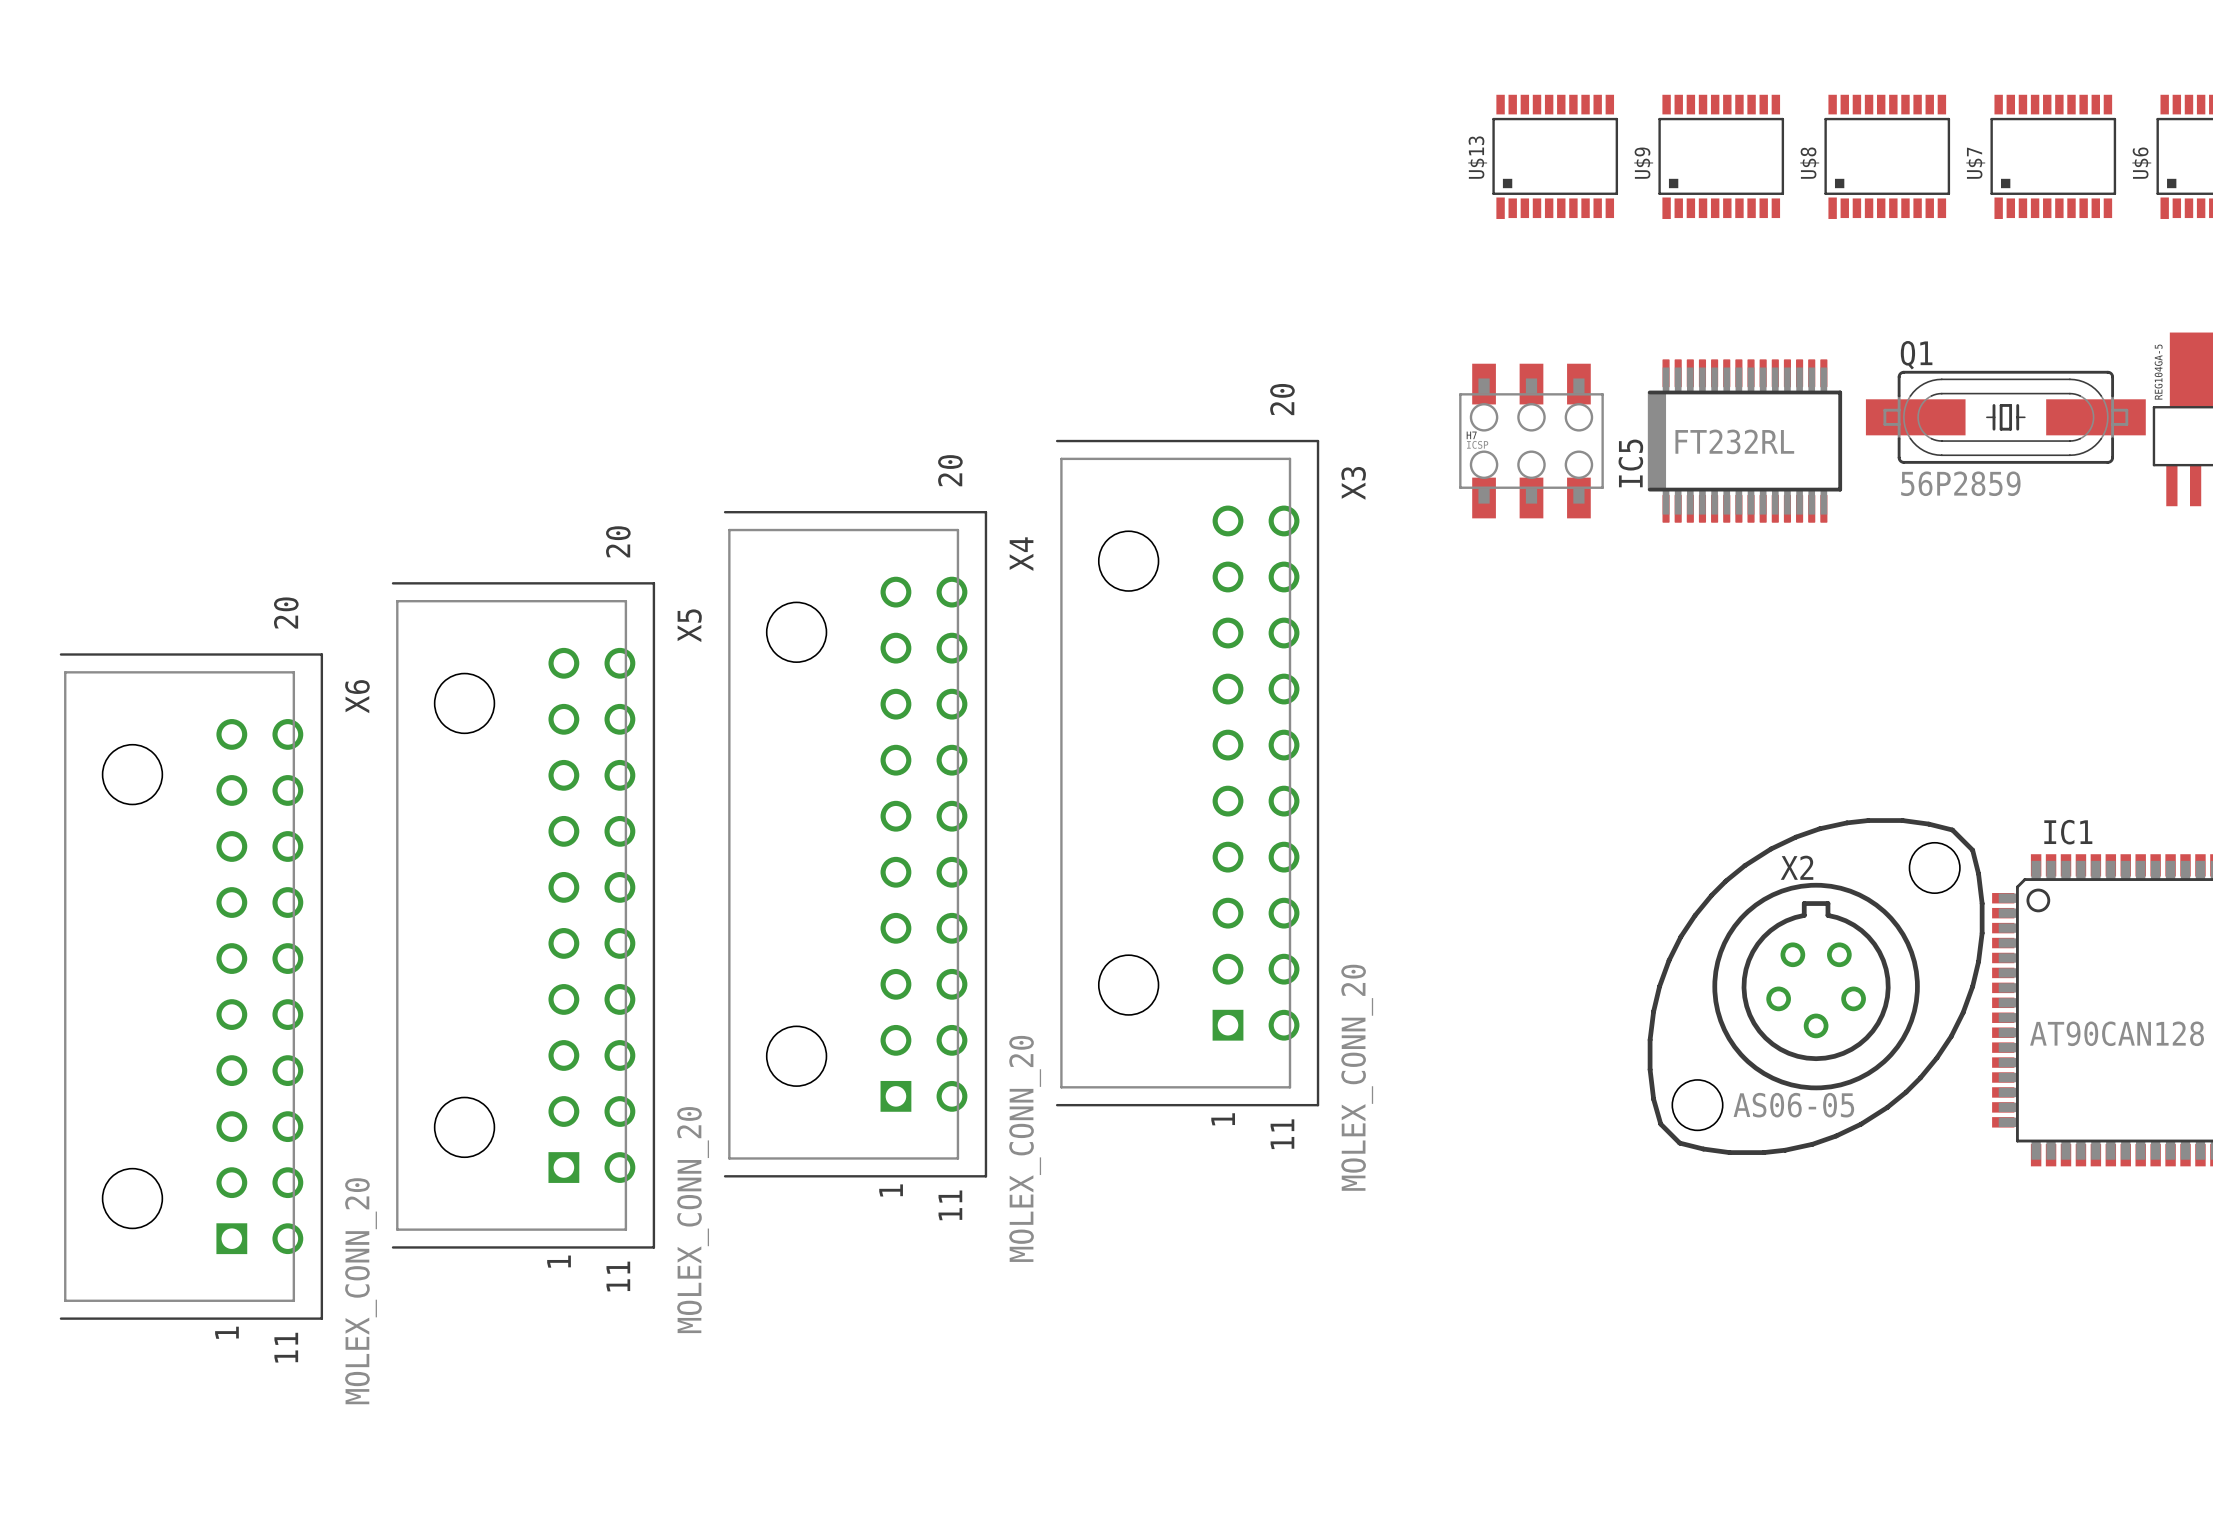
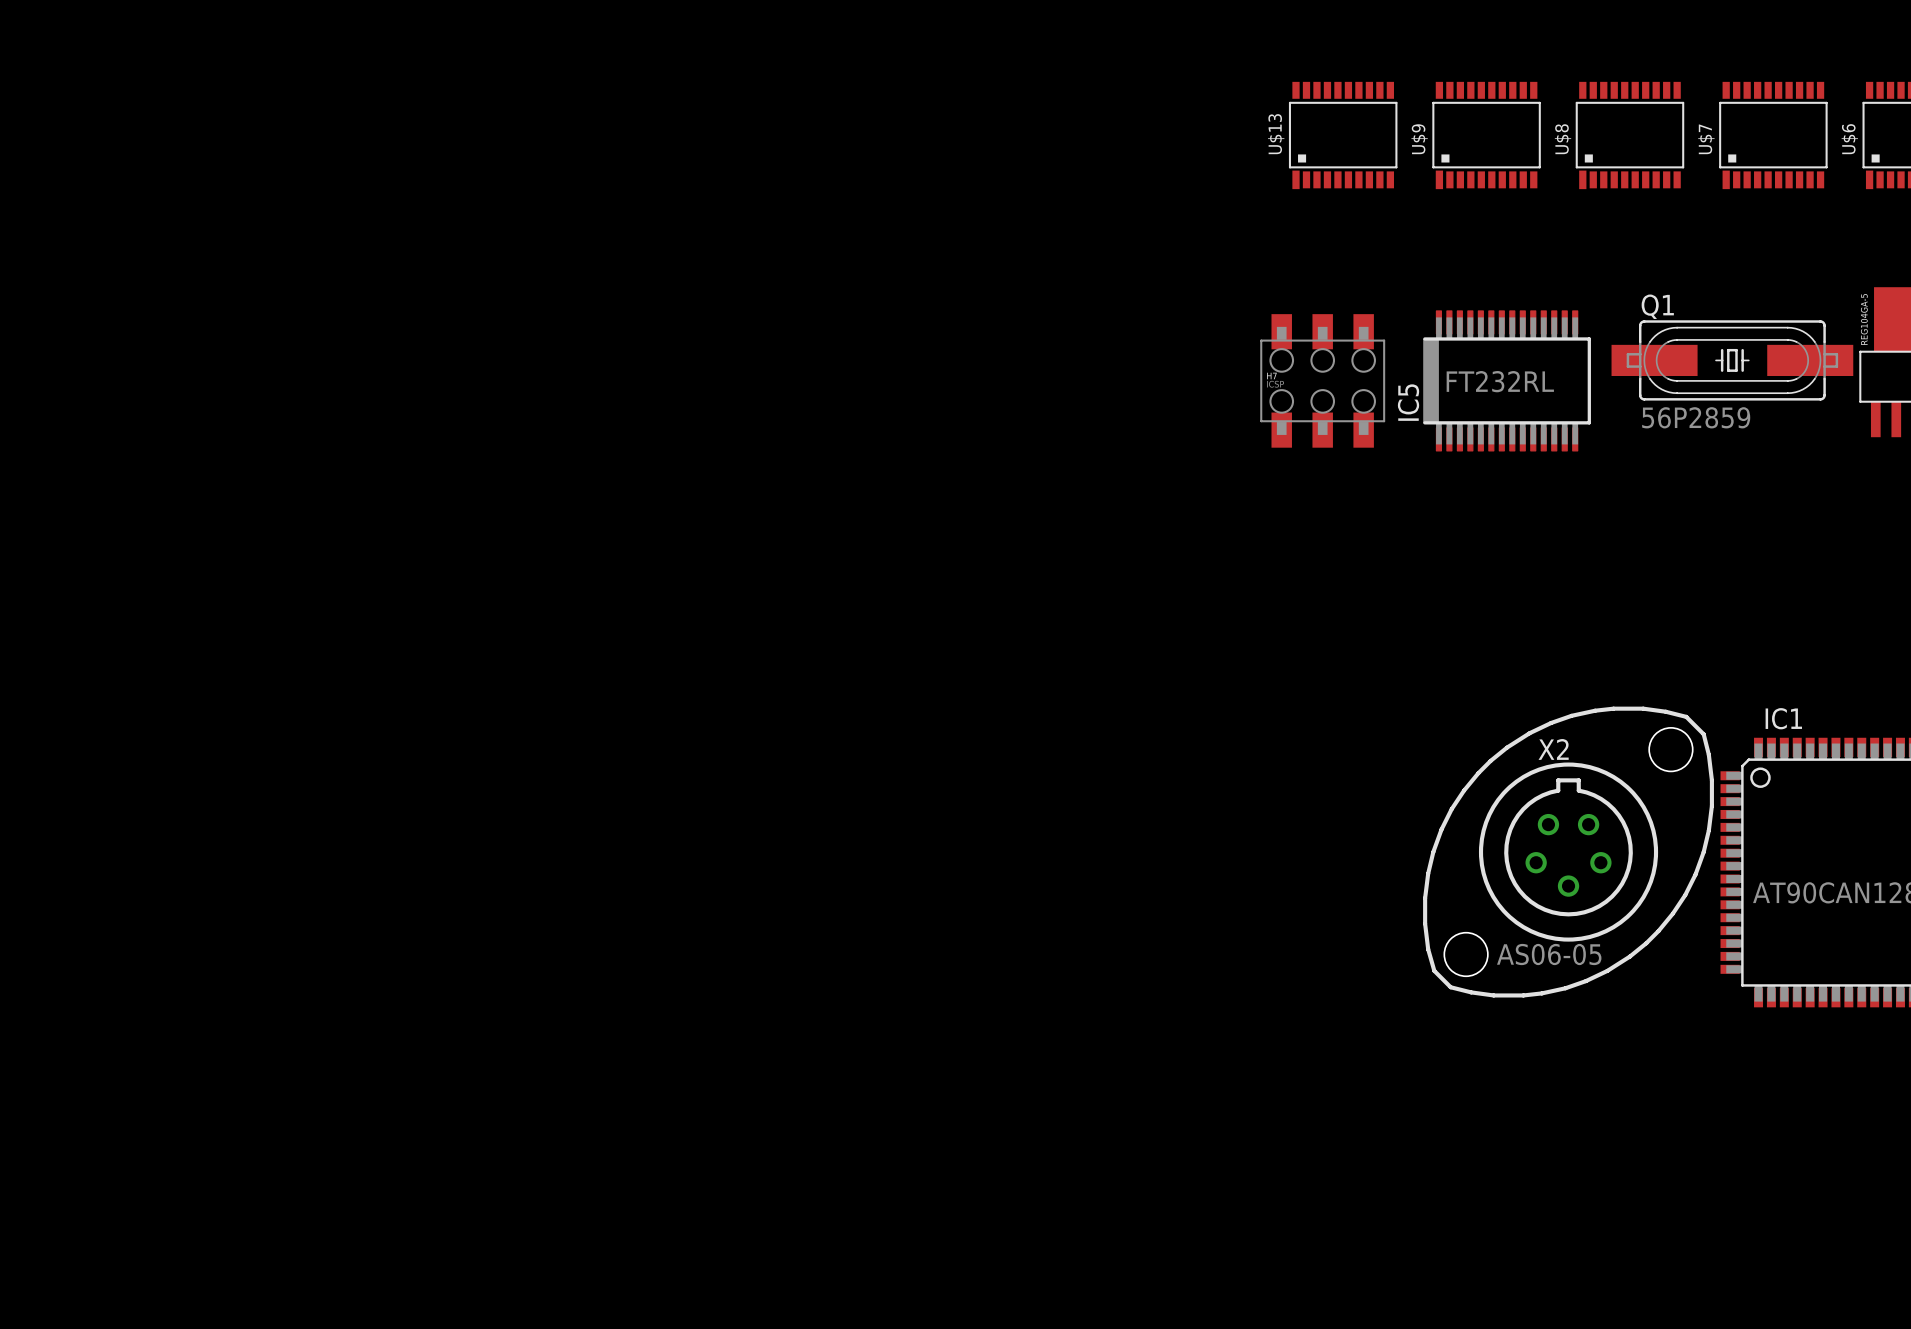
X3: MOLEX_CONN_20 (1187, 773) -> none
X4: MOLEX_CONN_20 (855, 844) -> none
X5: MOLEX_CONN_20 (523, 915) -> none
X6: MOLEX_CONN_20 (191, 986) -> none

